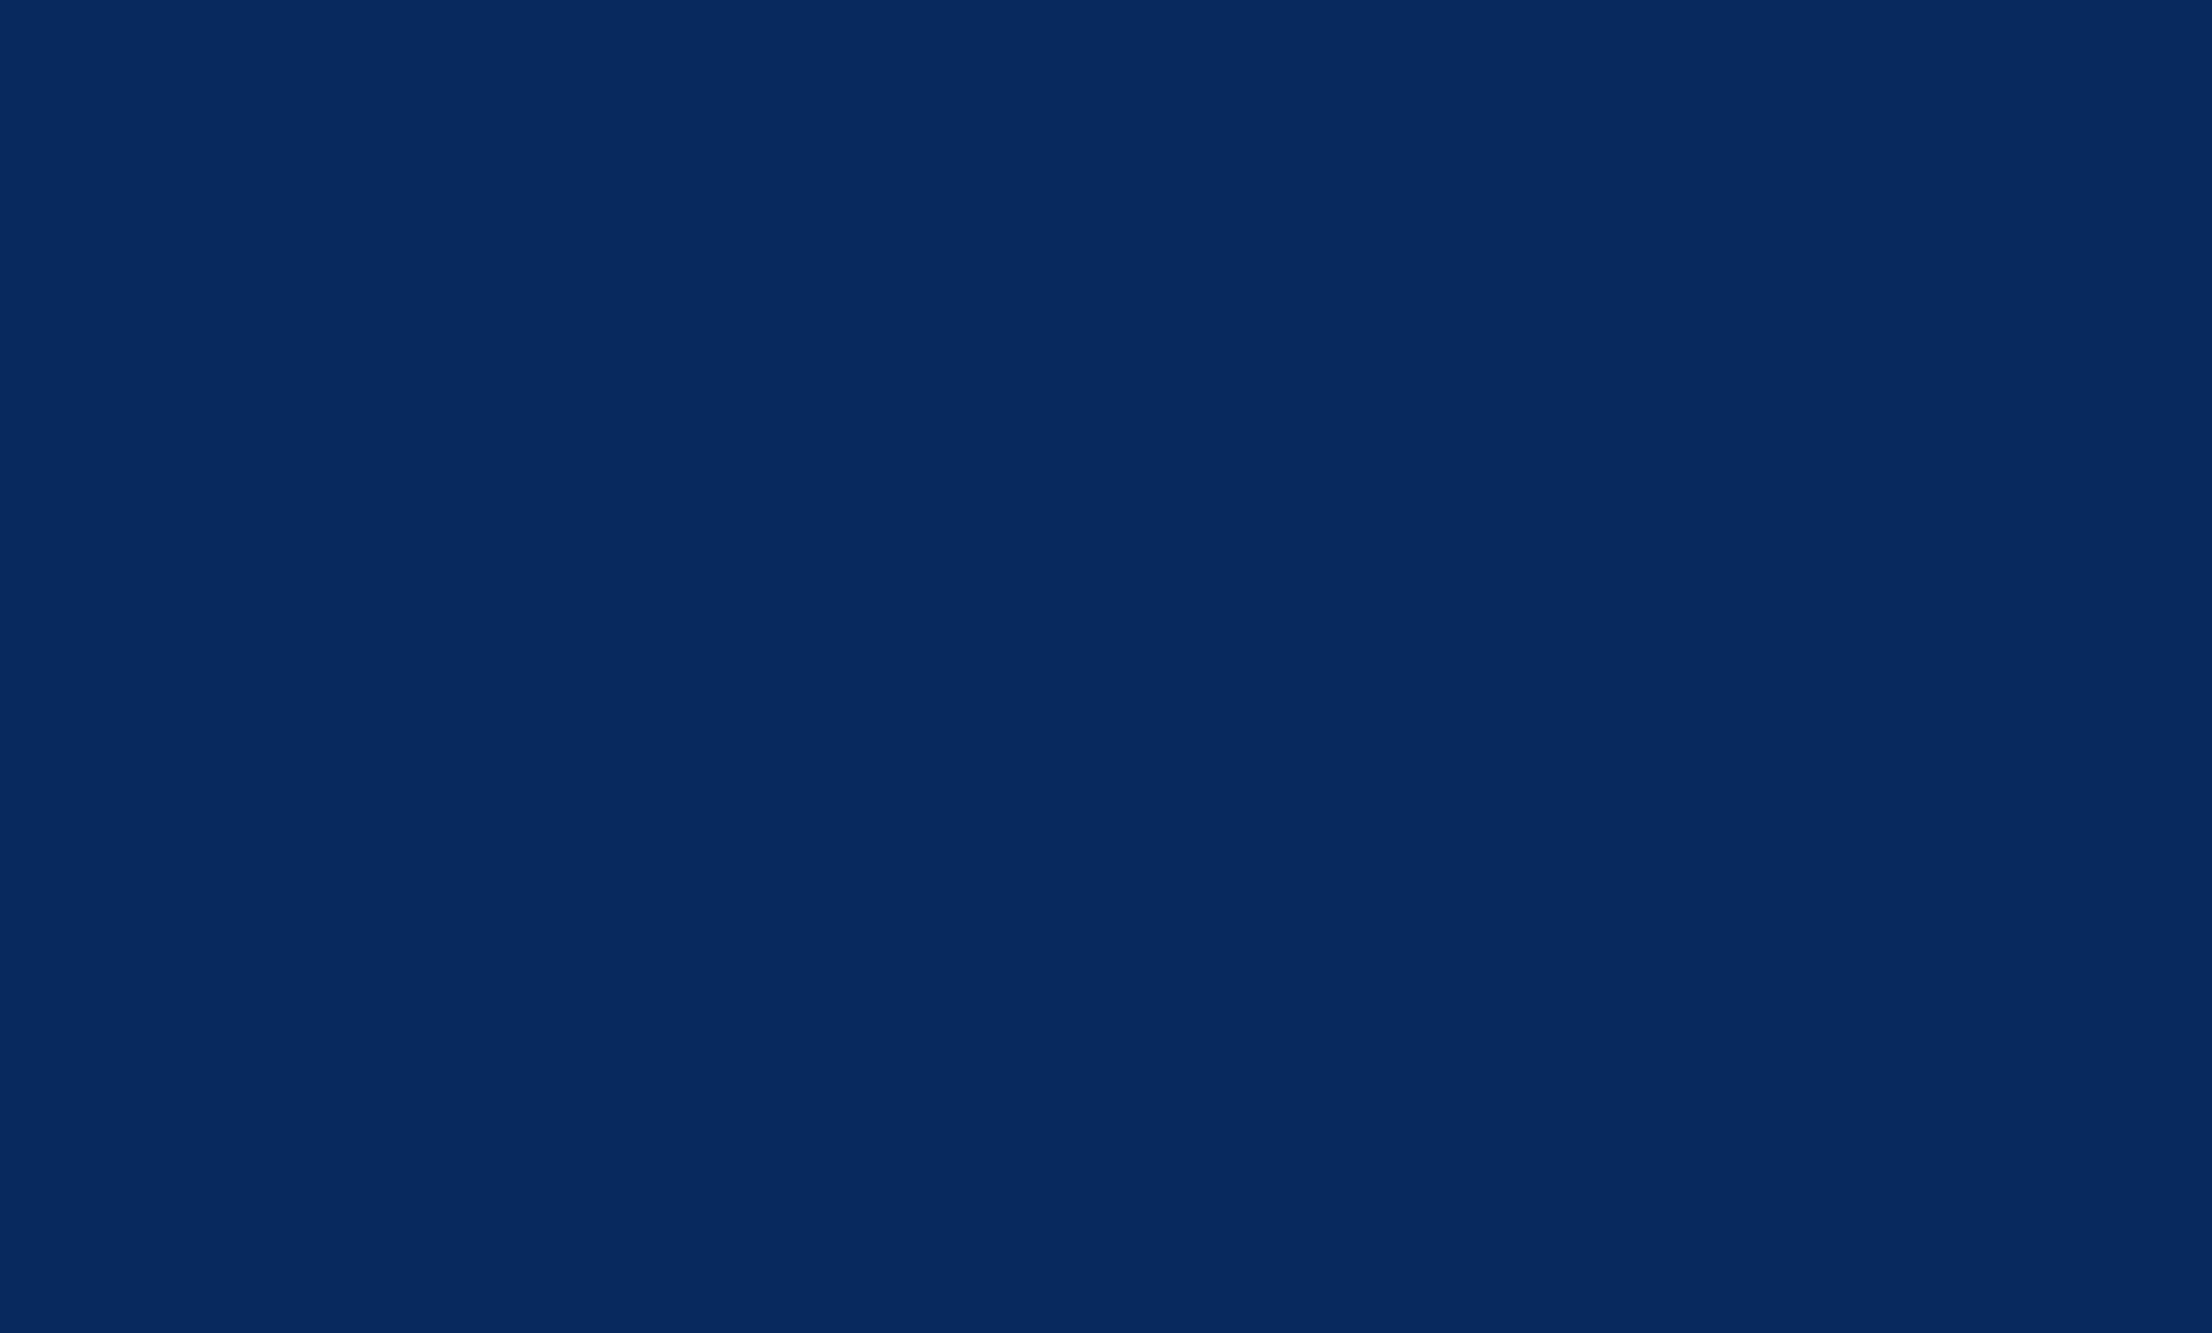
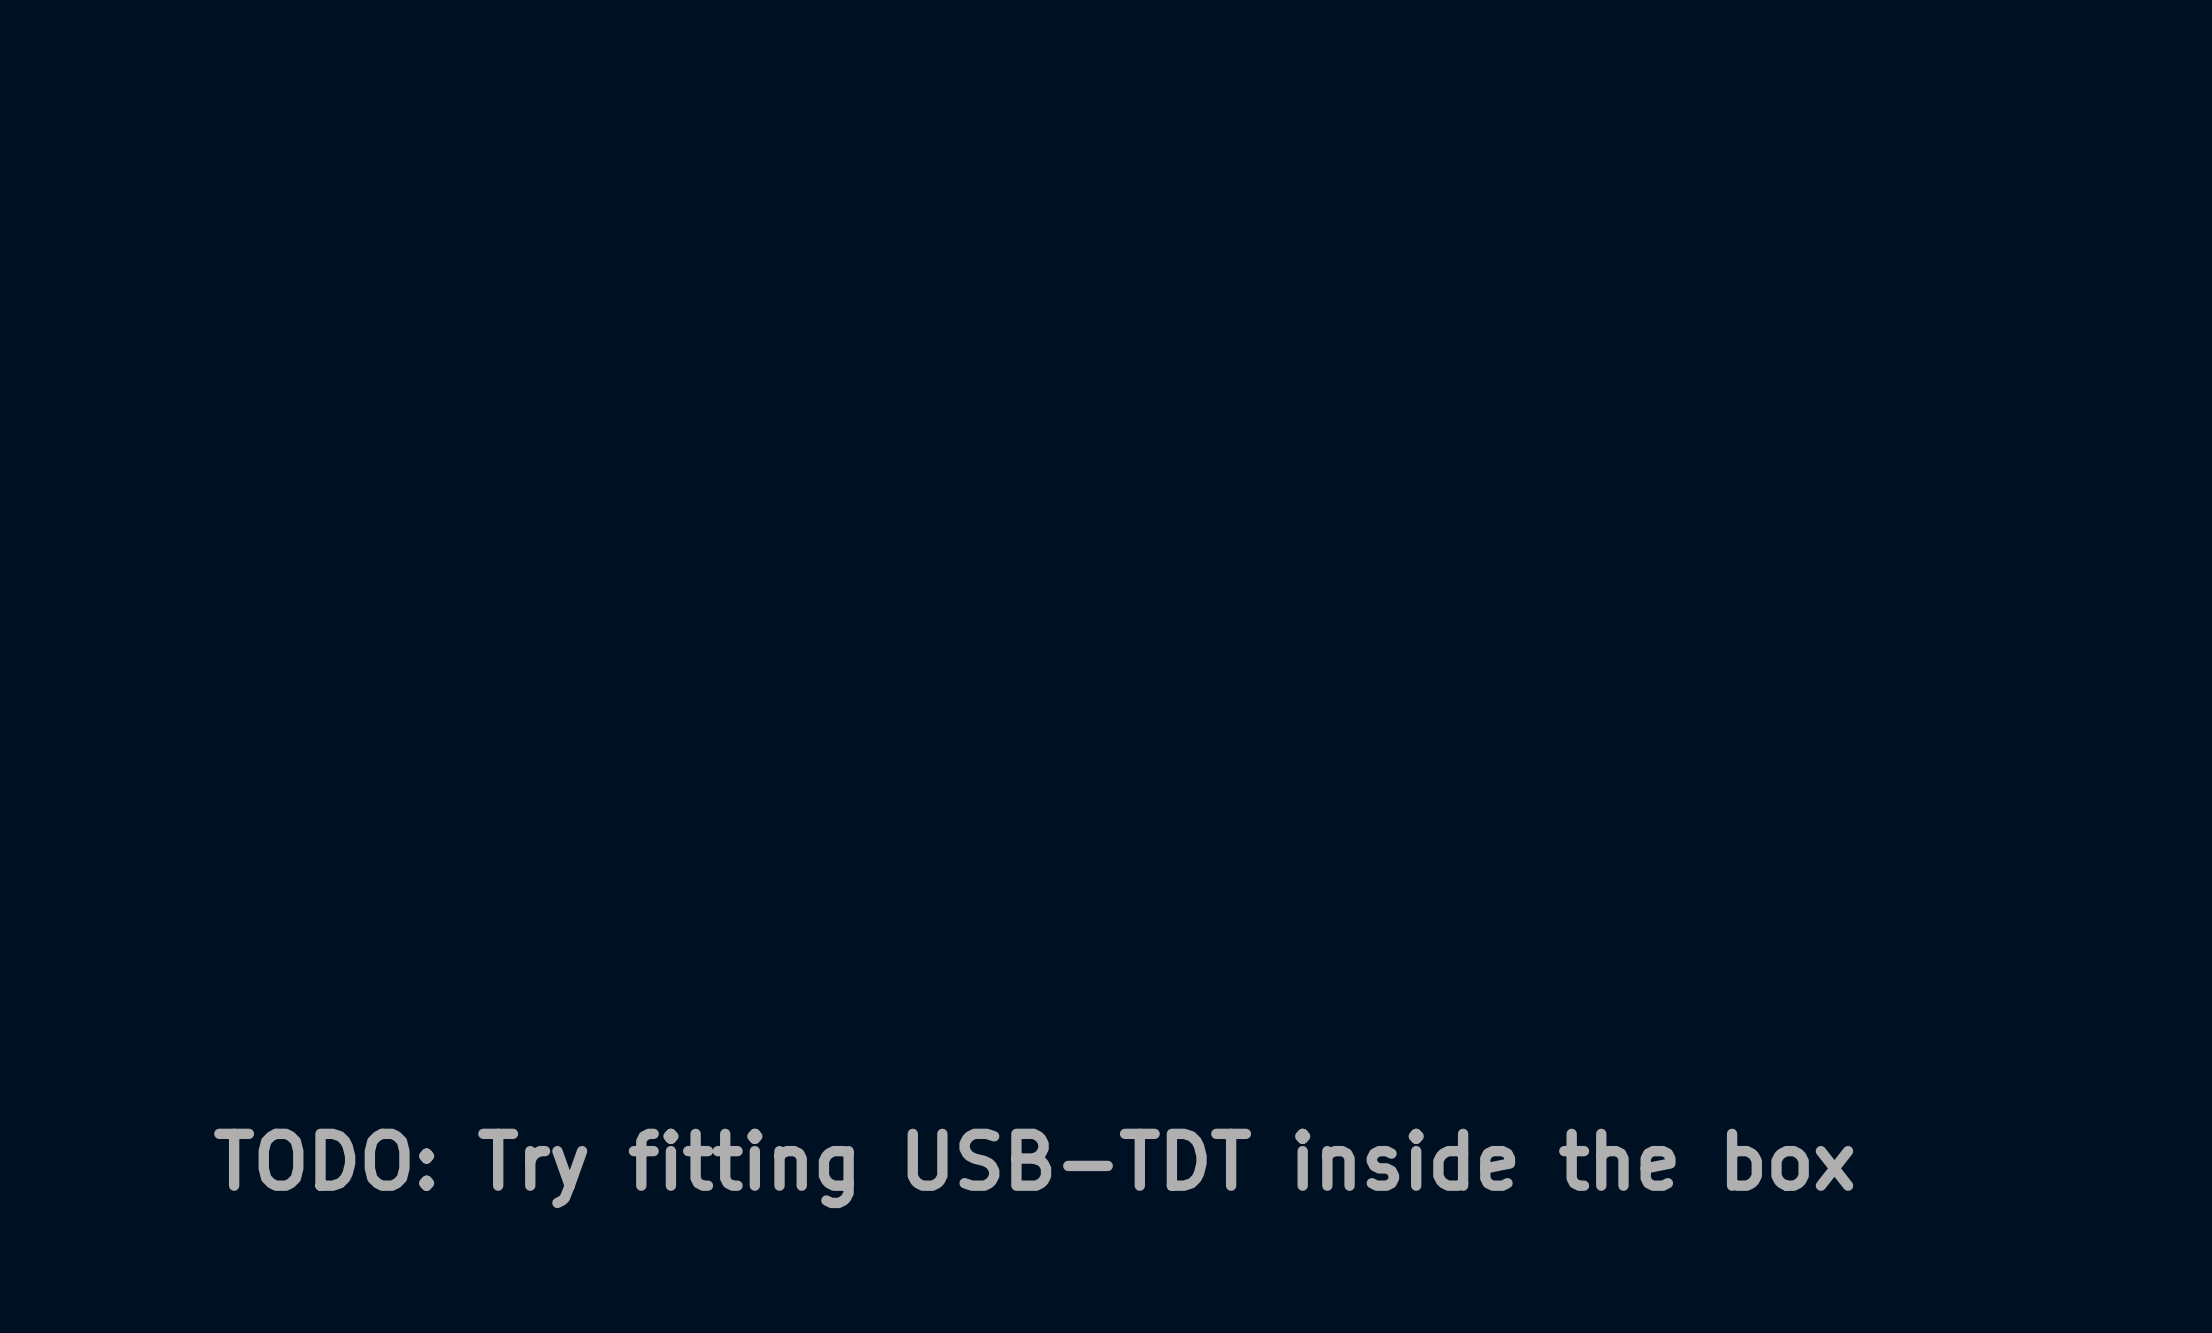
text: none -> TODO: Try fitting USB-TDT inside the box (1033, 1168)

